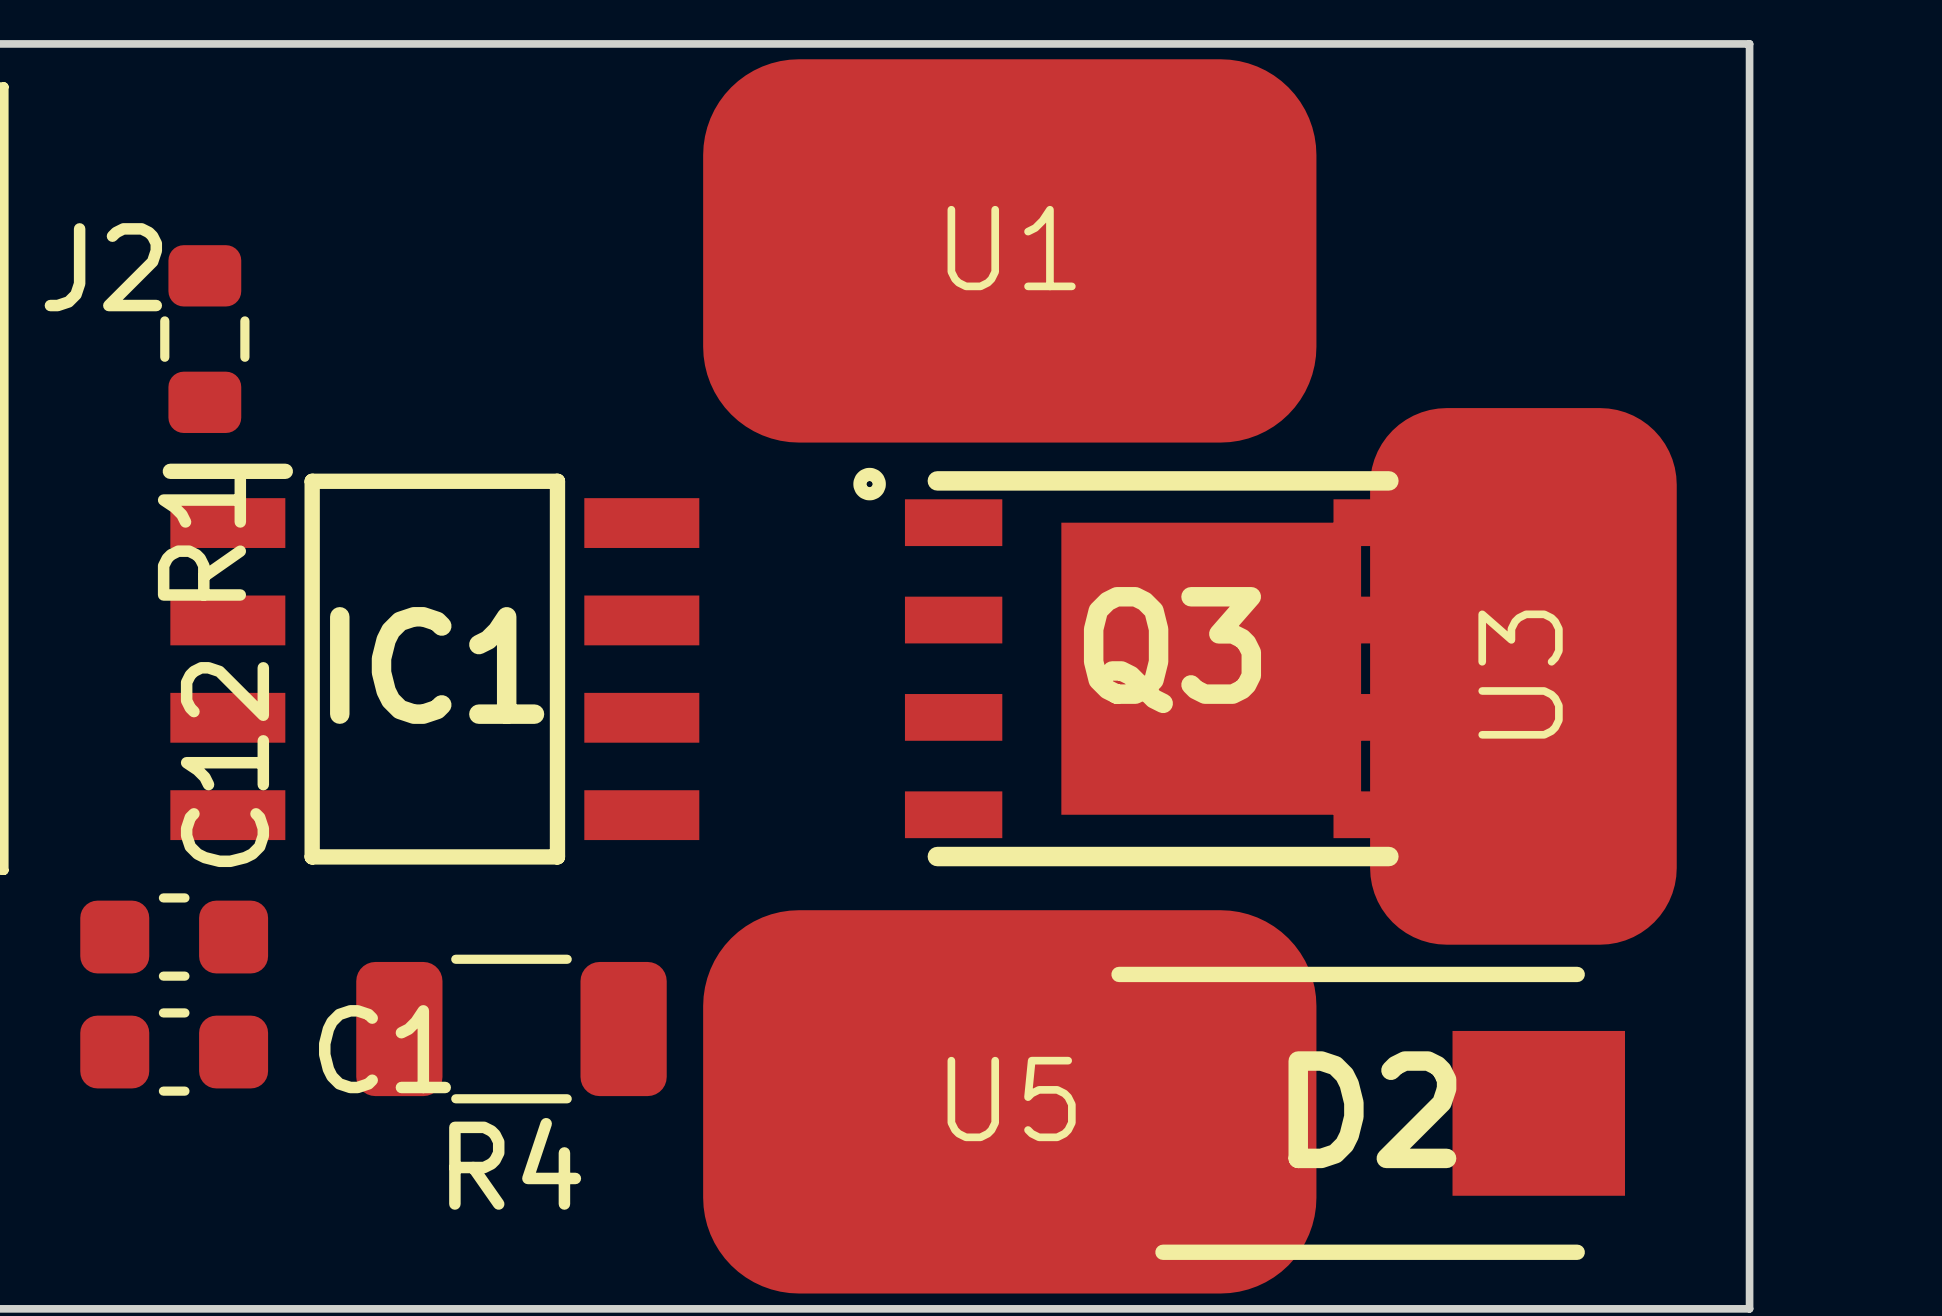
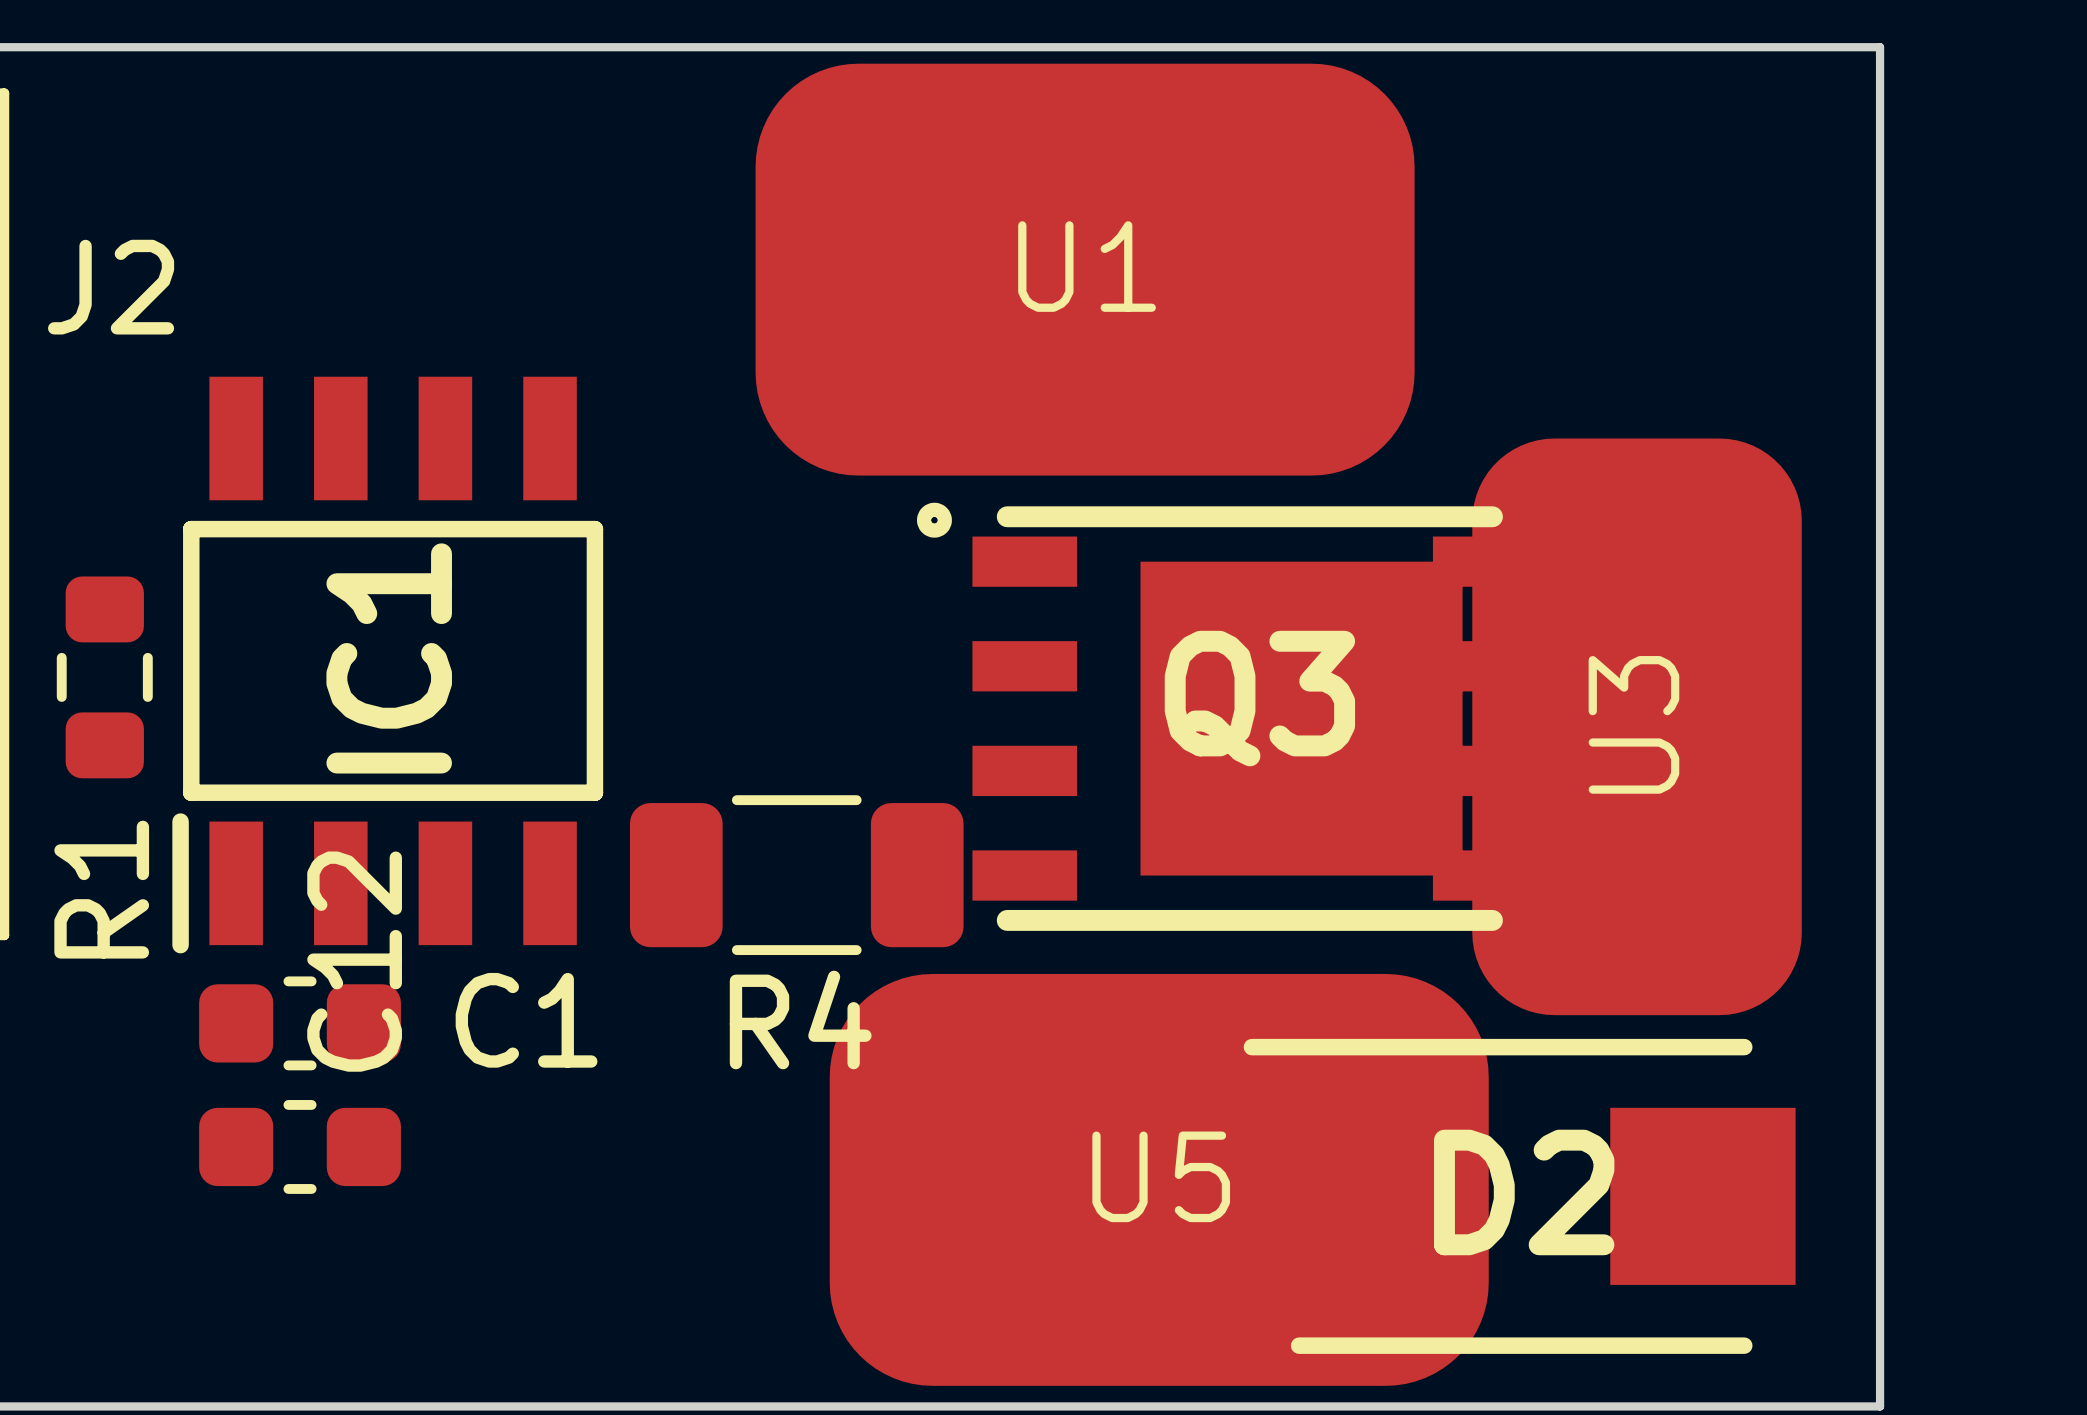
R1 position: (204, 339) -> (104, 677)
IC1 rotation: 0° (430, 664) -> 90° counterclockwise (387, 665)
C12 position: (174, 937) -> (300, 1146)
R4 position: (511, 1029) -> (796, 875)
C1 position: (174, 1052) -> (300, 1023)
U5 position: (1009, 1101) -> (1159, 1179)
D2 position: (1368, 1113) -> (1519, 1196)

